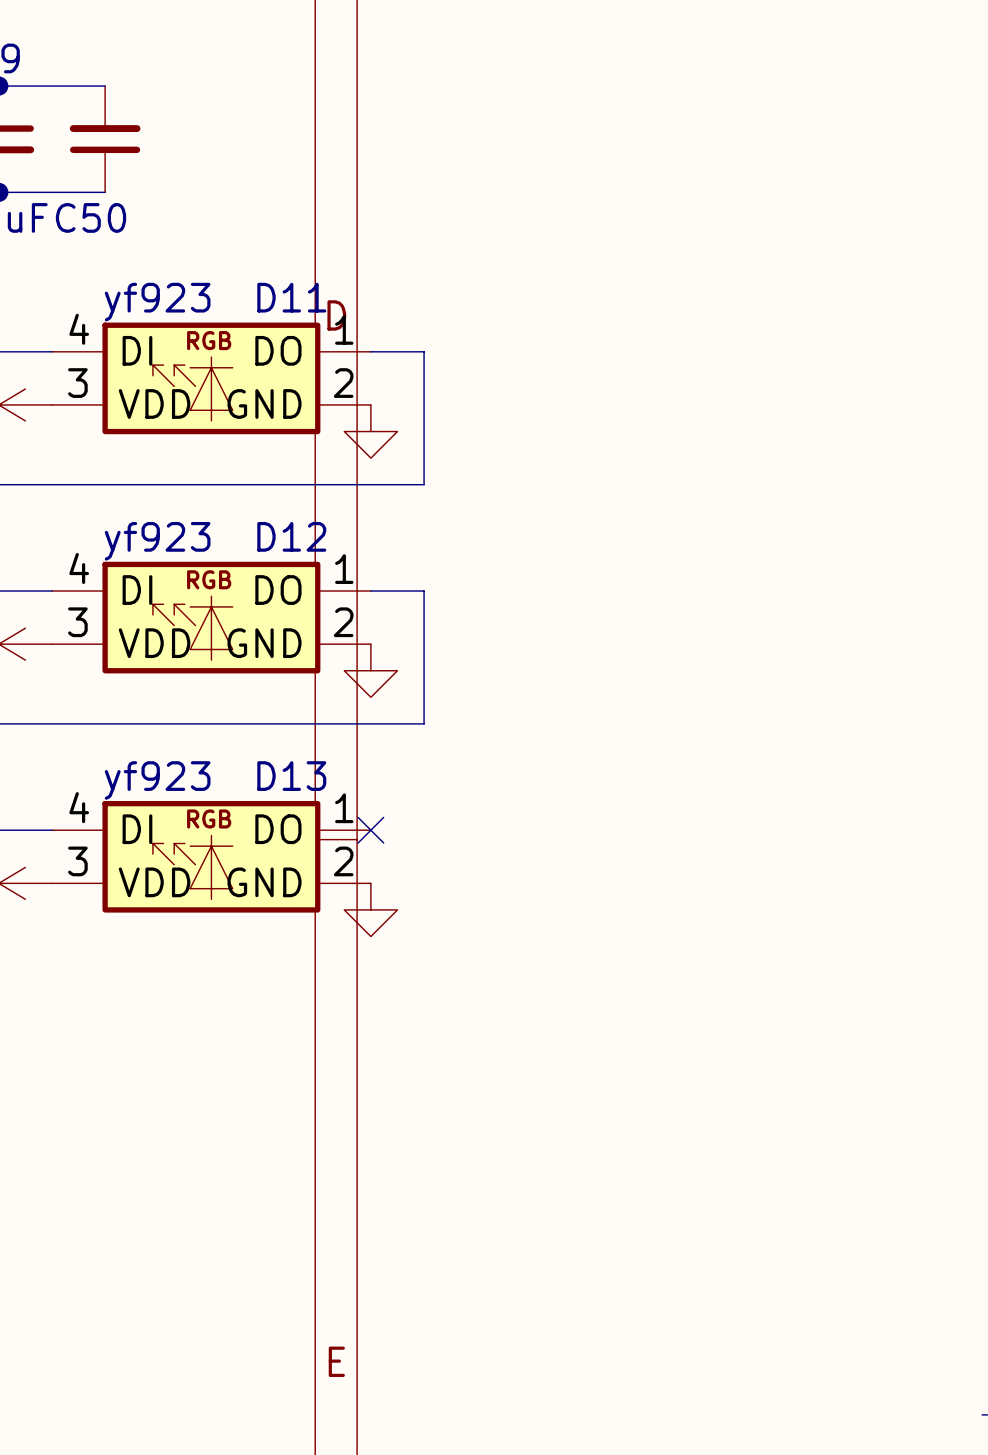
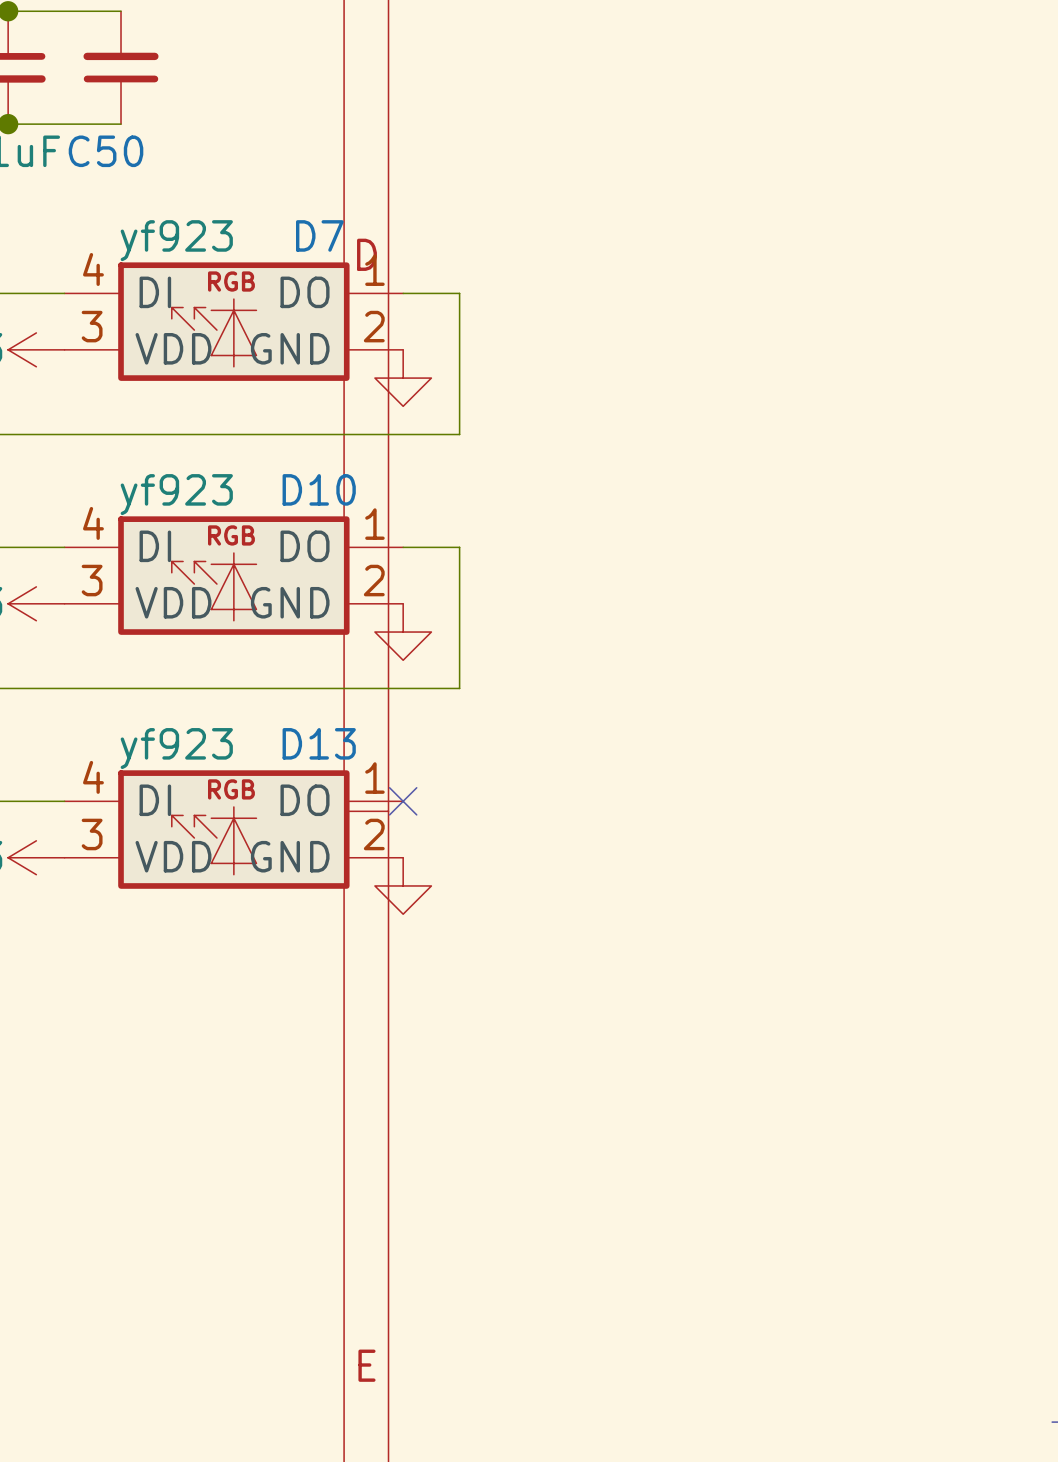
D11 name: D11 (291, 297) -> D7 (319, 235)
D12 name: D12 (291, 536) -> D10 (319, 489)

